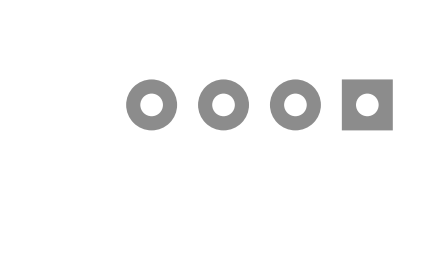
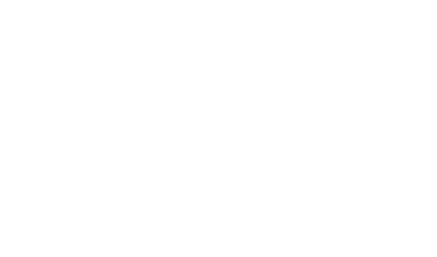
part: (259, 104) -> none

